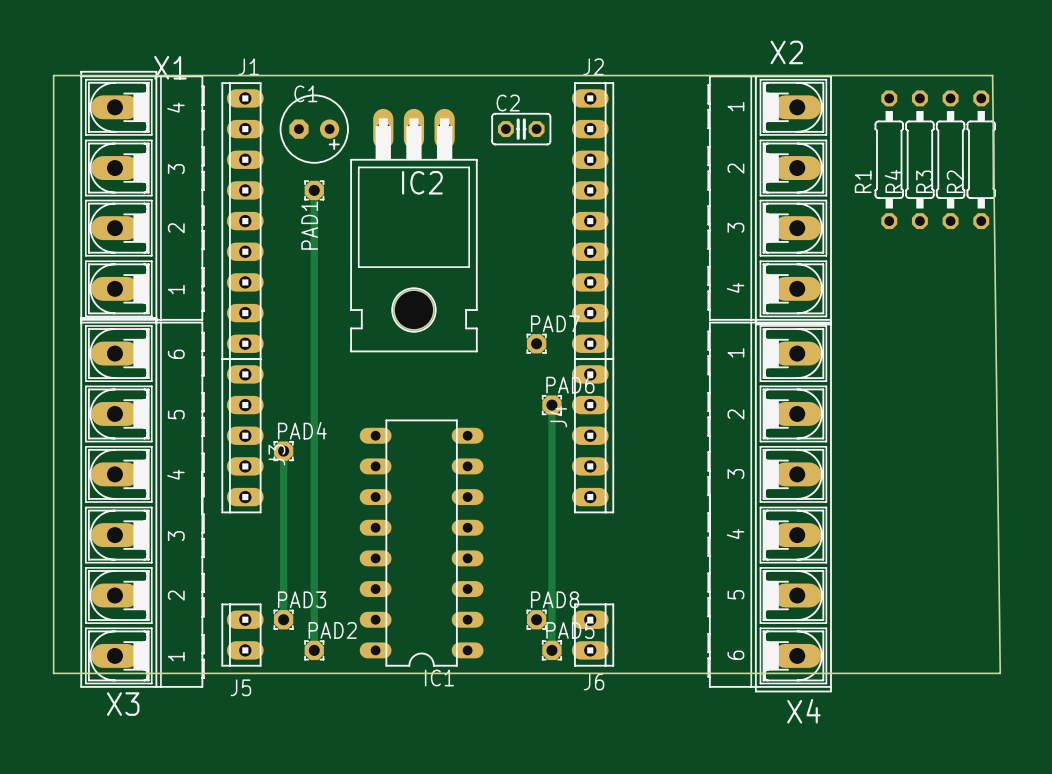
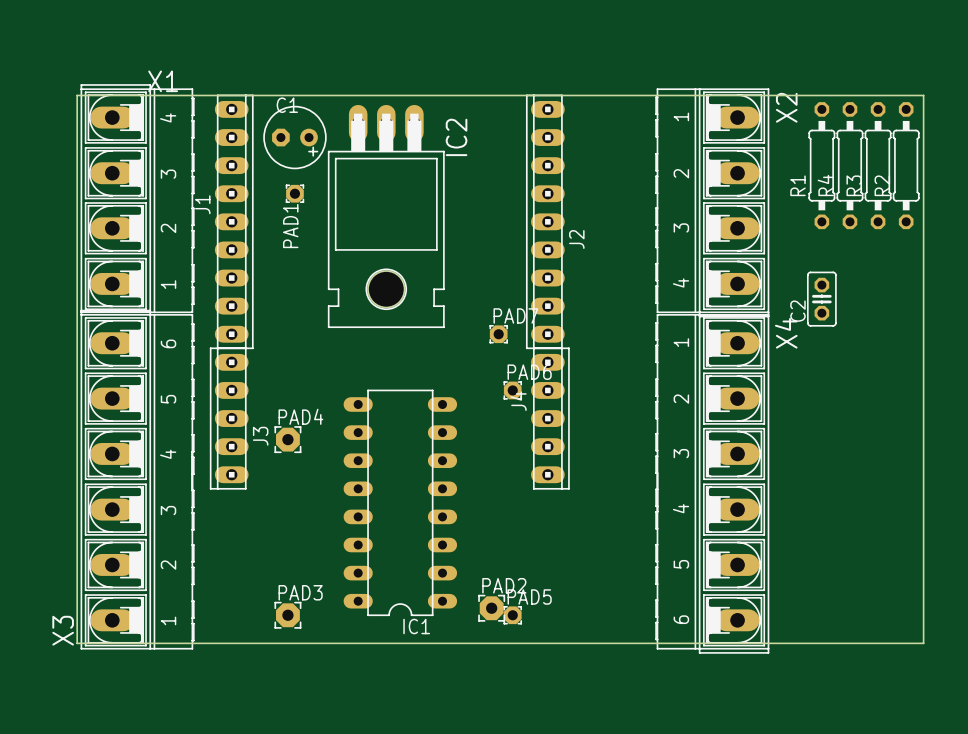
X2 name rotation: 0° (786, 52) -> 90° counterclockwise (786, 107)
X2 name position: X2 (786, 52) -> X2 (786, 107)
J1 name position: J1 (248, 66) -> J1 (202, 204)
J2 name position: J2 (593, 66) -> J2 (576, 239)
board edge: (53, 75) (992, 75) (1000, 673) (53, 673) (53, 75) -> (77, 95) (77, 643) (923, 643) (923, 95) (77, 95)
C2 name position: C2 (508, 103) -> C2 (797, 311)
C2 rotation: 0° (521, 129) -> 90° clockwise (821, 299)
C2 position: (521, 129) -> (821, 299)
IC2 name rotation: 0° (422, 182) -> 90° counterclockwise (456, 137)
IC2 name position: IC2 (422, 182) -> IC2 (456, 137)
track: (314, 190) (314, 650) -> none
J1 rotation: 0° (242, 221) -> 180° (234, 221)
J2 rotation: 0° (593, 221) -> 180° (545, 221)
IC2 position: (413, 230) -> (386, 216)
track: (551, 405) (551, 650) -> none
PAD4 footprint: [273, 440, 294, 462] -> [274, 426, 302, 454]
track: (283, 451) (283, 619) -> none
IC1 position: (421, 543) -> (400, 502)
PAD3 footprint: [273, 609, 294, 630] -> [274, 601, 302, 629]
PAD8: (536, 619) -> none
J5: (242, 635) -> none
J6: (593, 635) -> none
PAD2 footprint: [304, 640, 325, 661] -> [478, 594, 506, 622]
X3 name rotation: 0° (123, 704) -> 90° counterclockwise (63, 630)
X3 name position: X3 (123, 704) -> X3 (63, 630)
X4 name rotation: 0° (803, 711) -> 90° counterclockwise (786, 333)
X4 name position: X4 (803, 711) -> X4 (786, 333)

